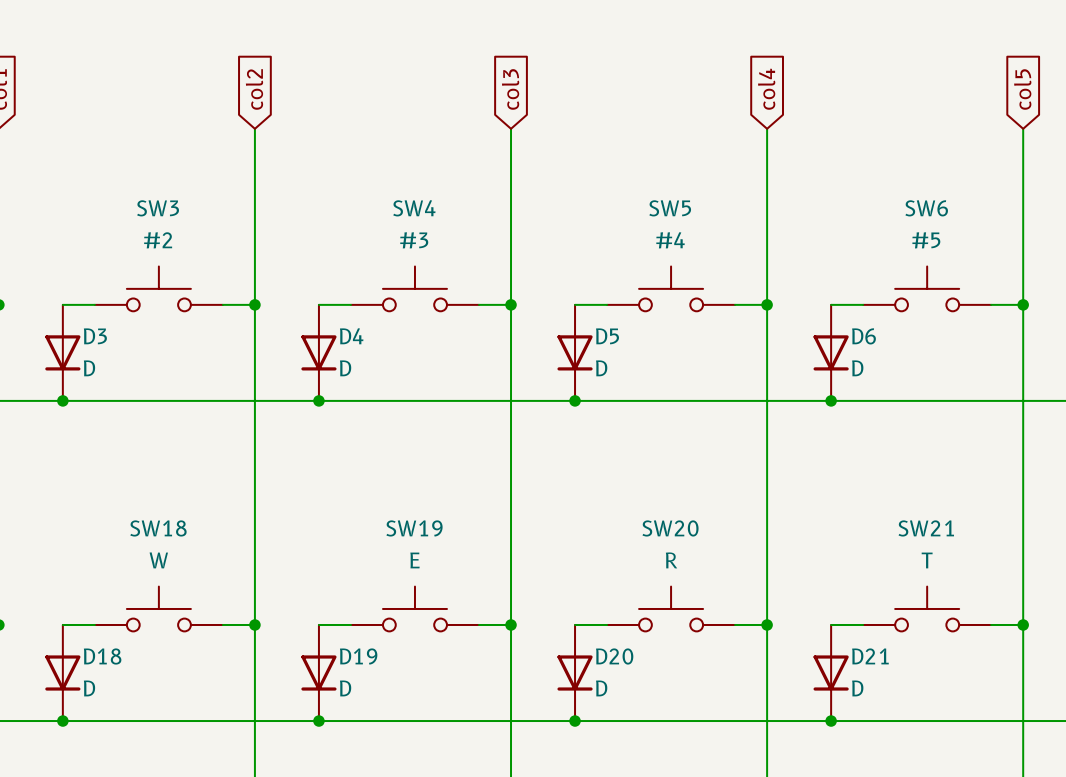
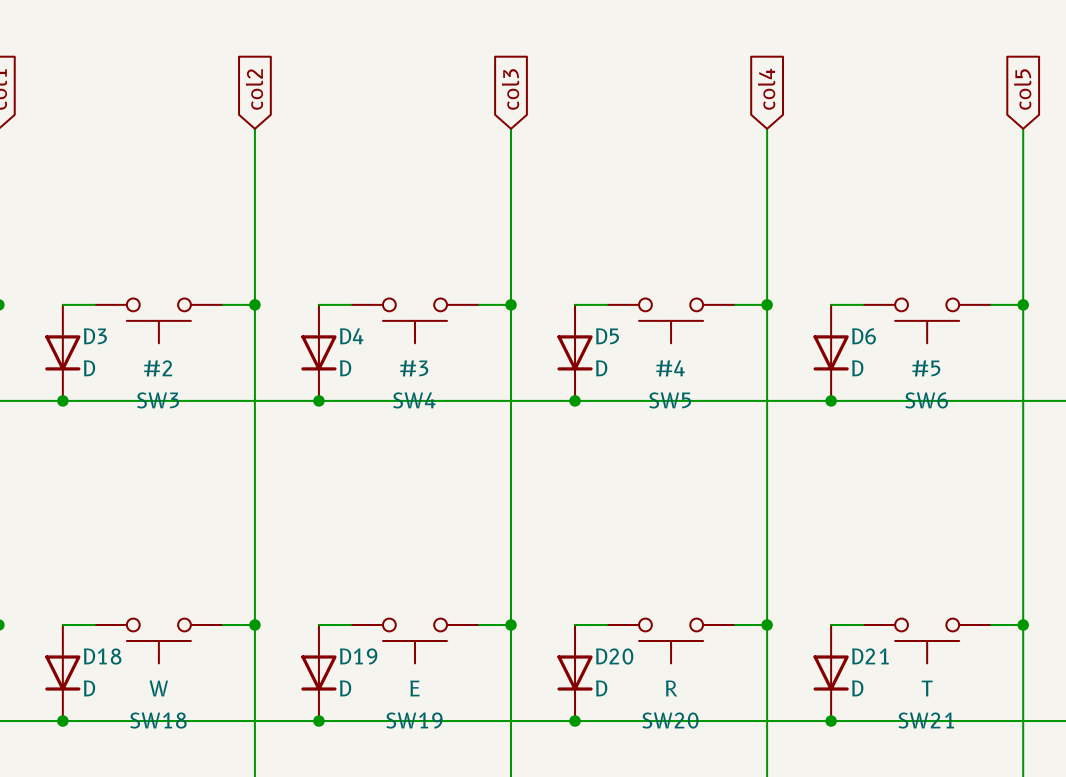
SW3 rotation: 0° (158, 288) -> 180° (158, 320)
SW4 rotation: 0° (414, 288) -> 180° (414, 320)
SW5 rotation: 0° (671, 288) -> 180° (671, 320)
SW6 rotation: 0° (927, 288) -> 180° (927, 320)
SW18 rotation: 0° (158, 608) -> 180° (158, 640)
SW19 rotation: 0° (414, 608) -> 180° (414, 640)
SW20 rotation: 0° (671, 608) -> 180° (671, 640)
SW21 rotation: 0° (927, 608) -> 180° (927, 640)

